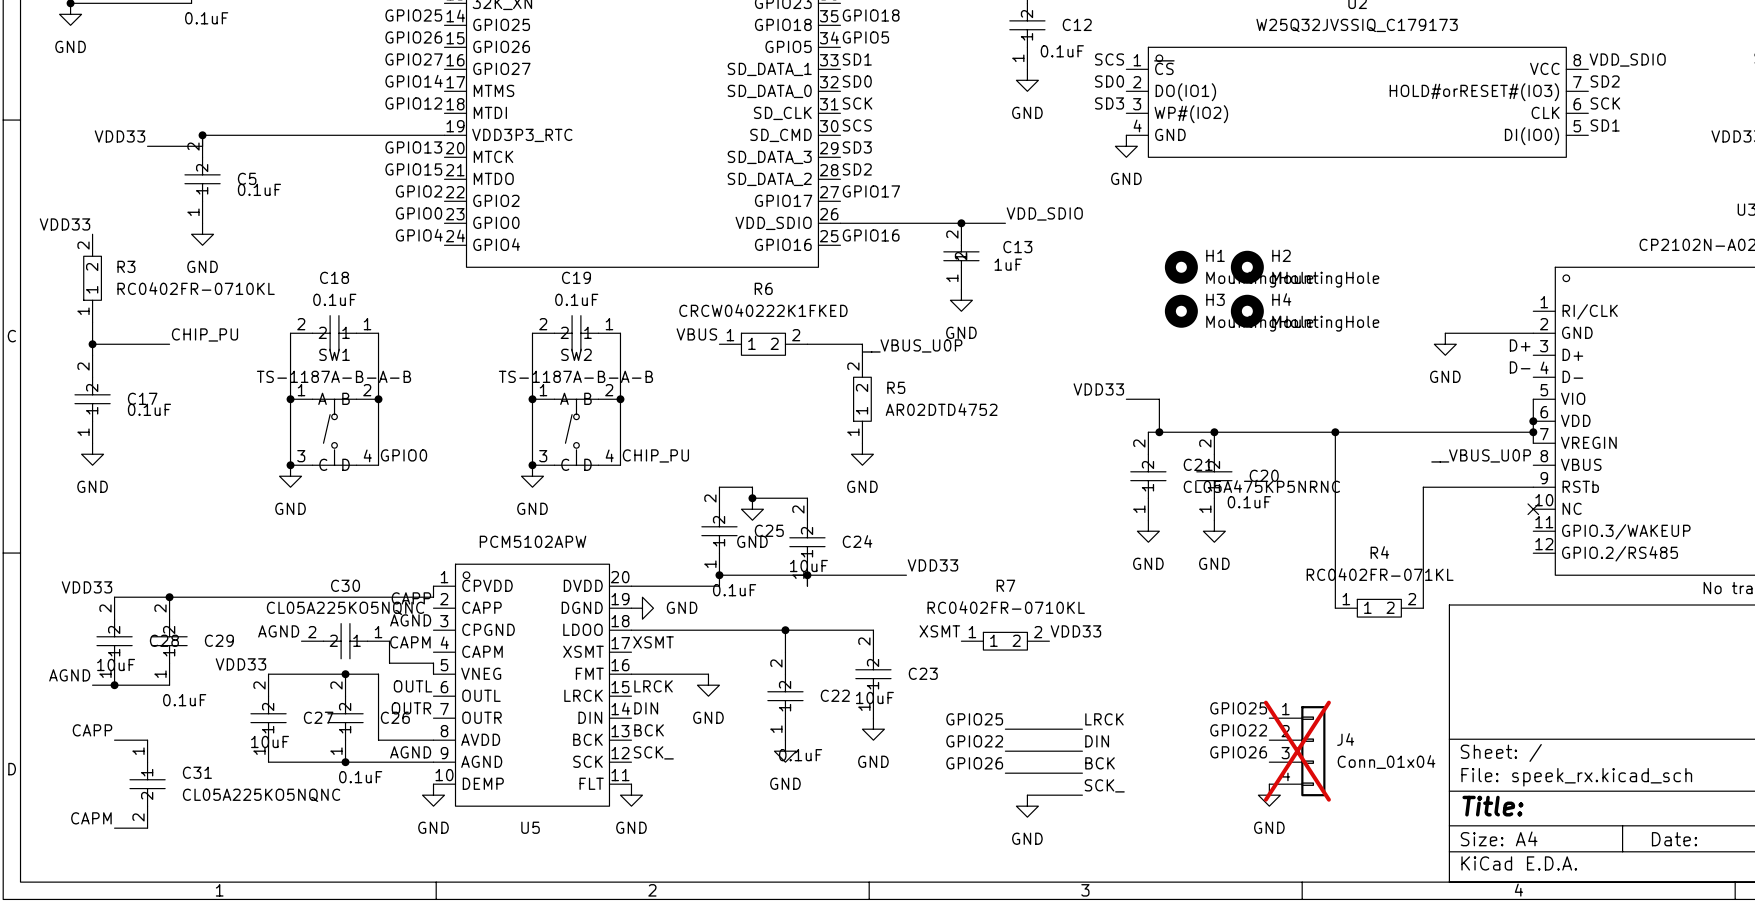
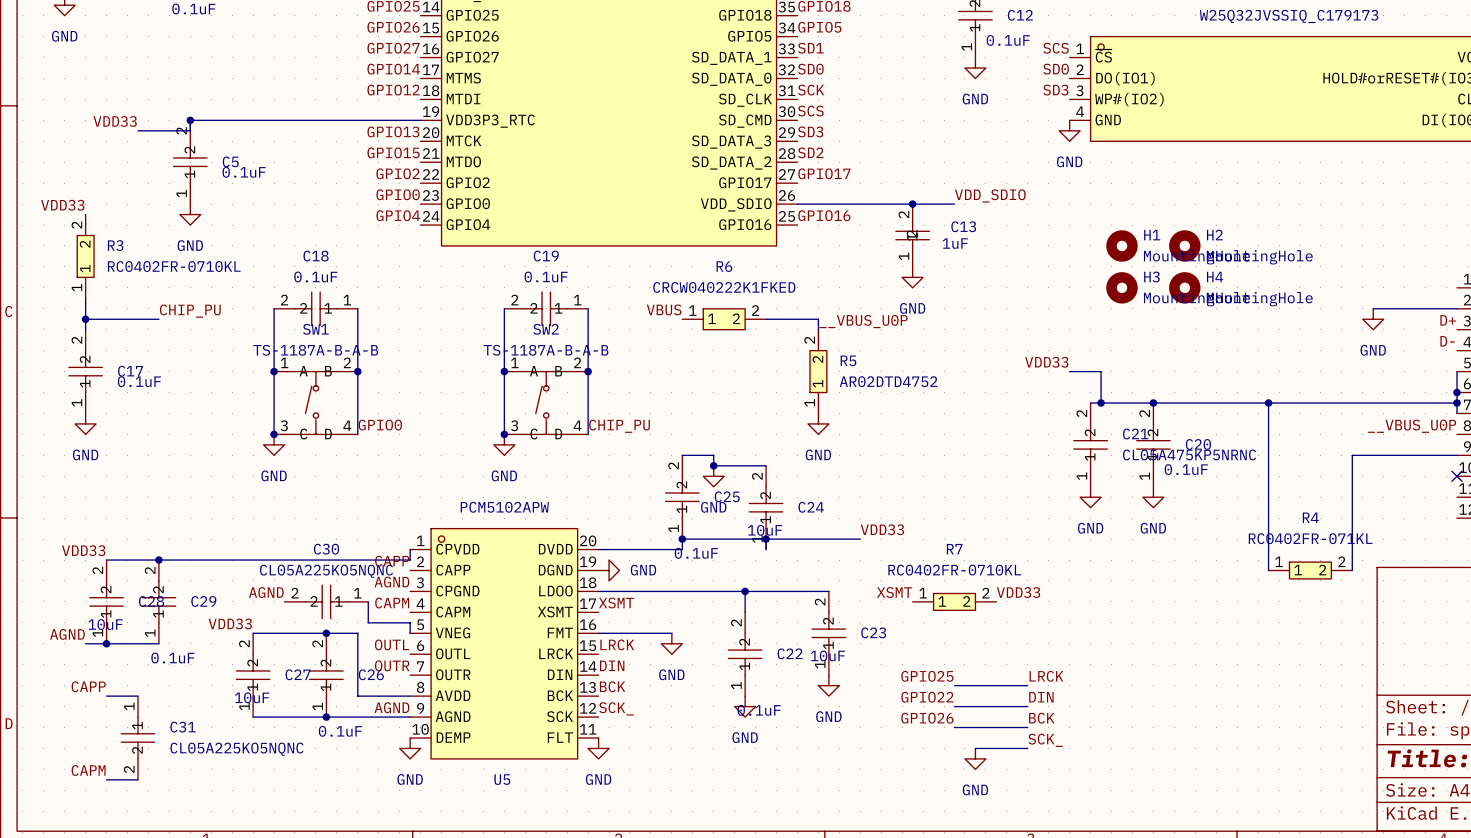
label: GPIO25 (1238, 708) -> none
label: GPIO22 (1238, 730) -> none
J4: Conn_01x04 (1297, 751) -> none
label: GPIO26 (1238, 752) -> none
power symbol: GND (1269, 795) -> none

